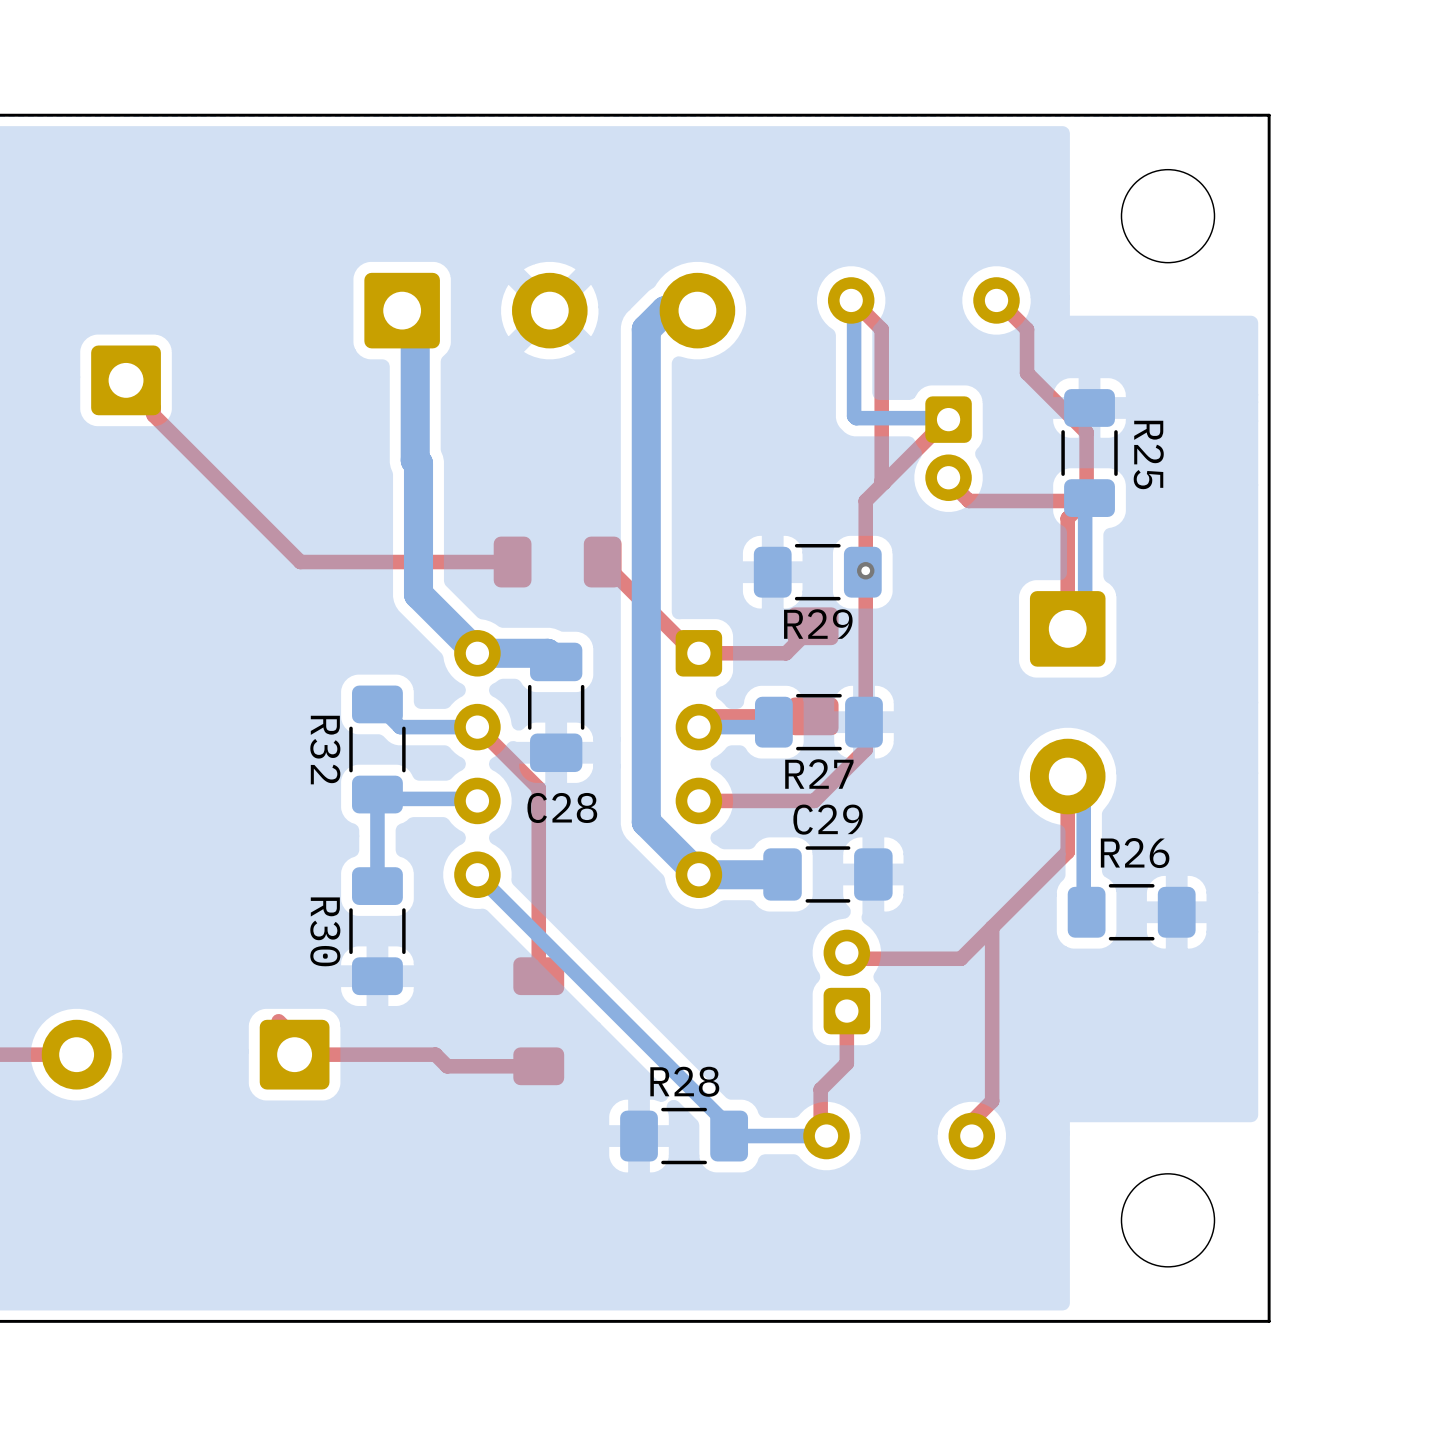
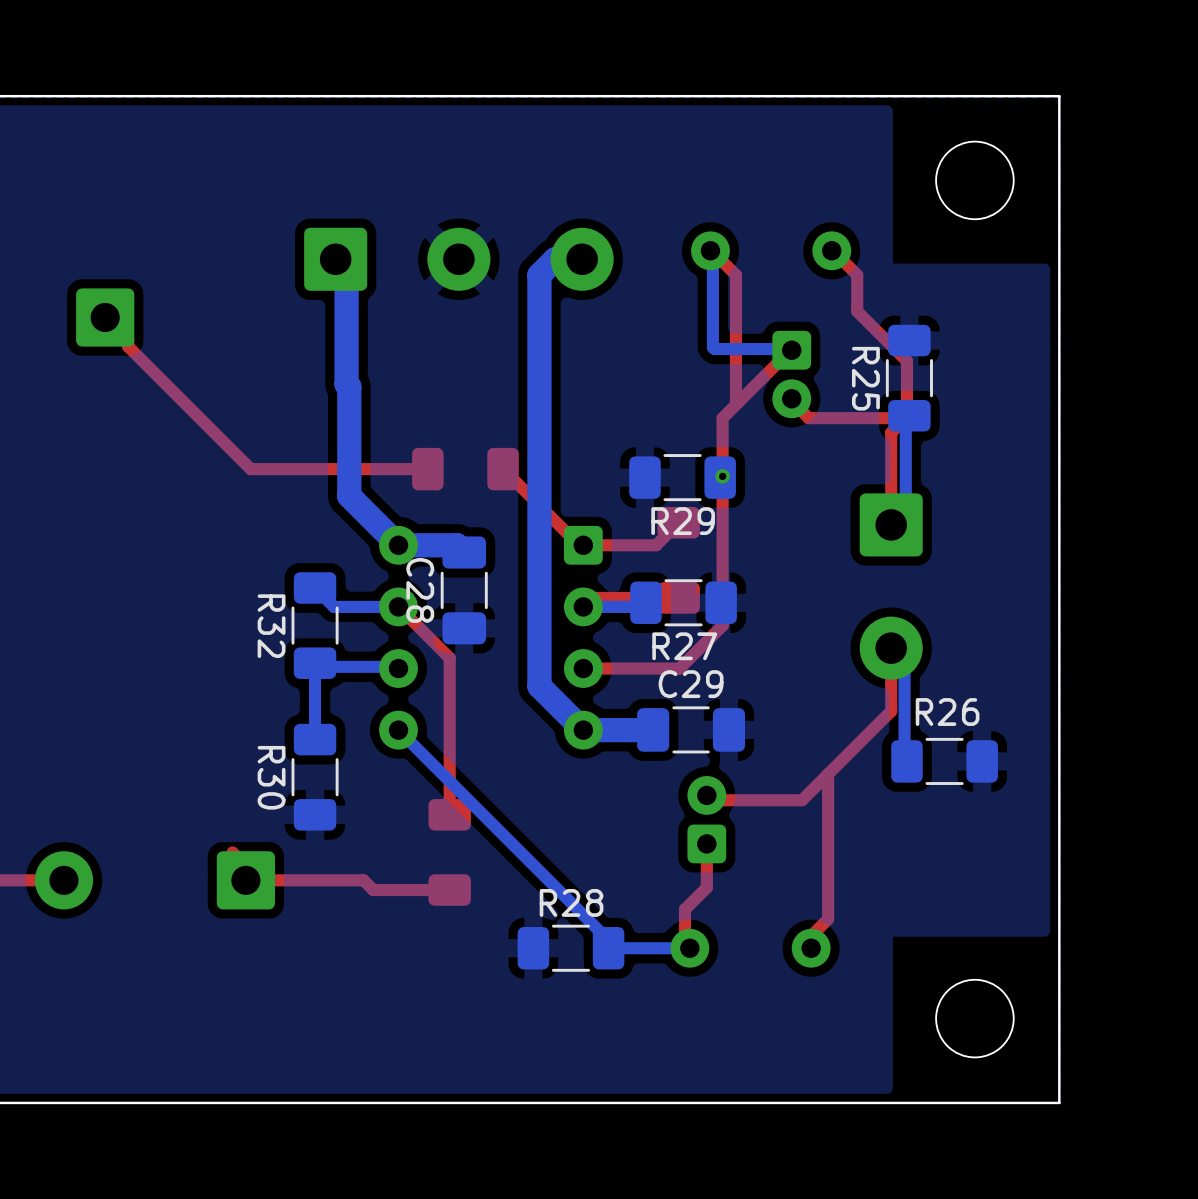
R25 name position: R25 (1148, 454) -> R25 (865, 378)
C28 name rotation: 0° (562, 807) -> 90° clockwise (420, 590)
C28 name position: C28 (562, 807) -> C28 (420, 590)

